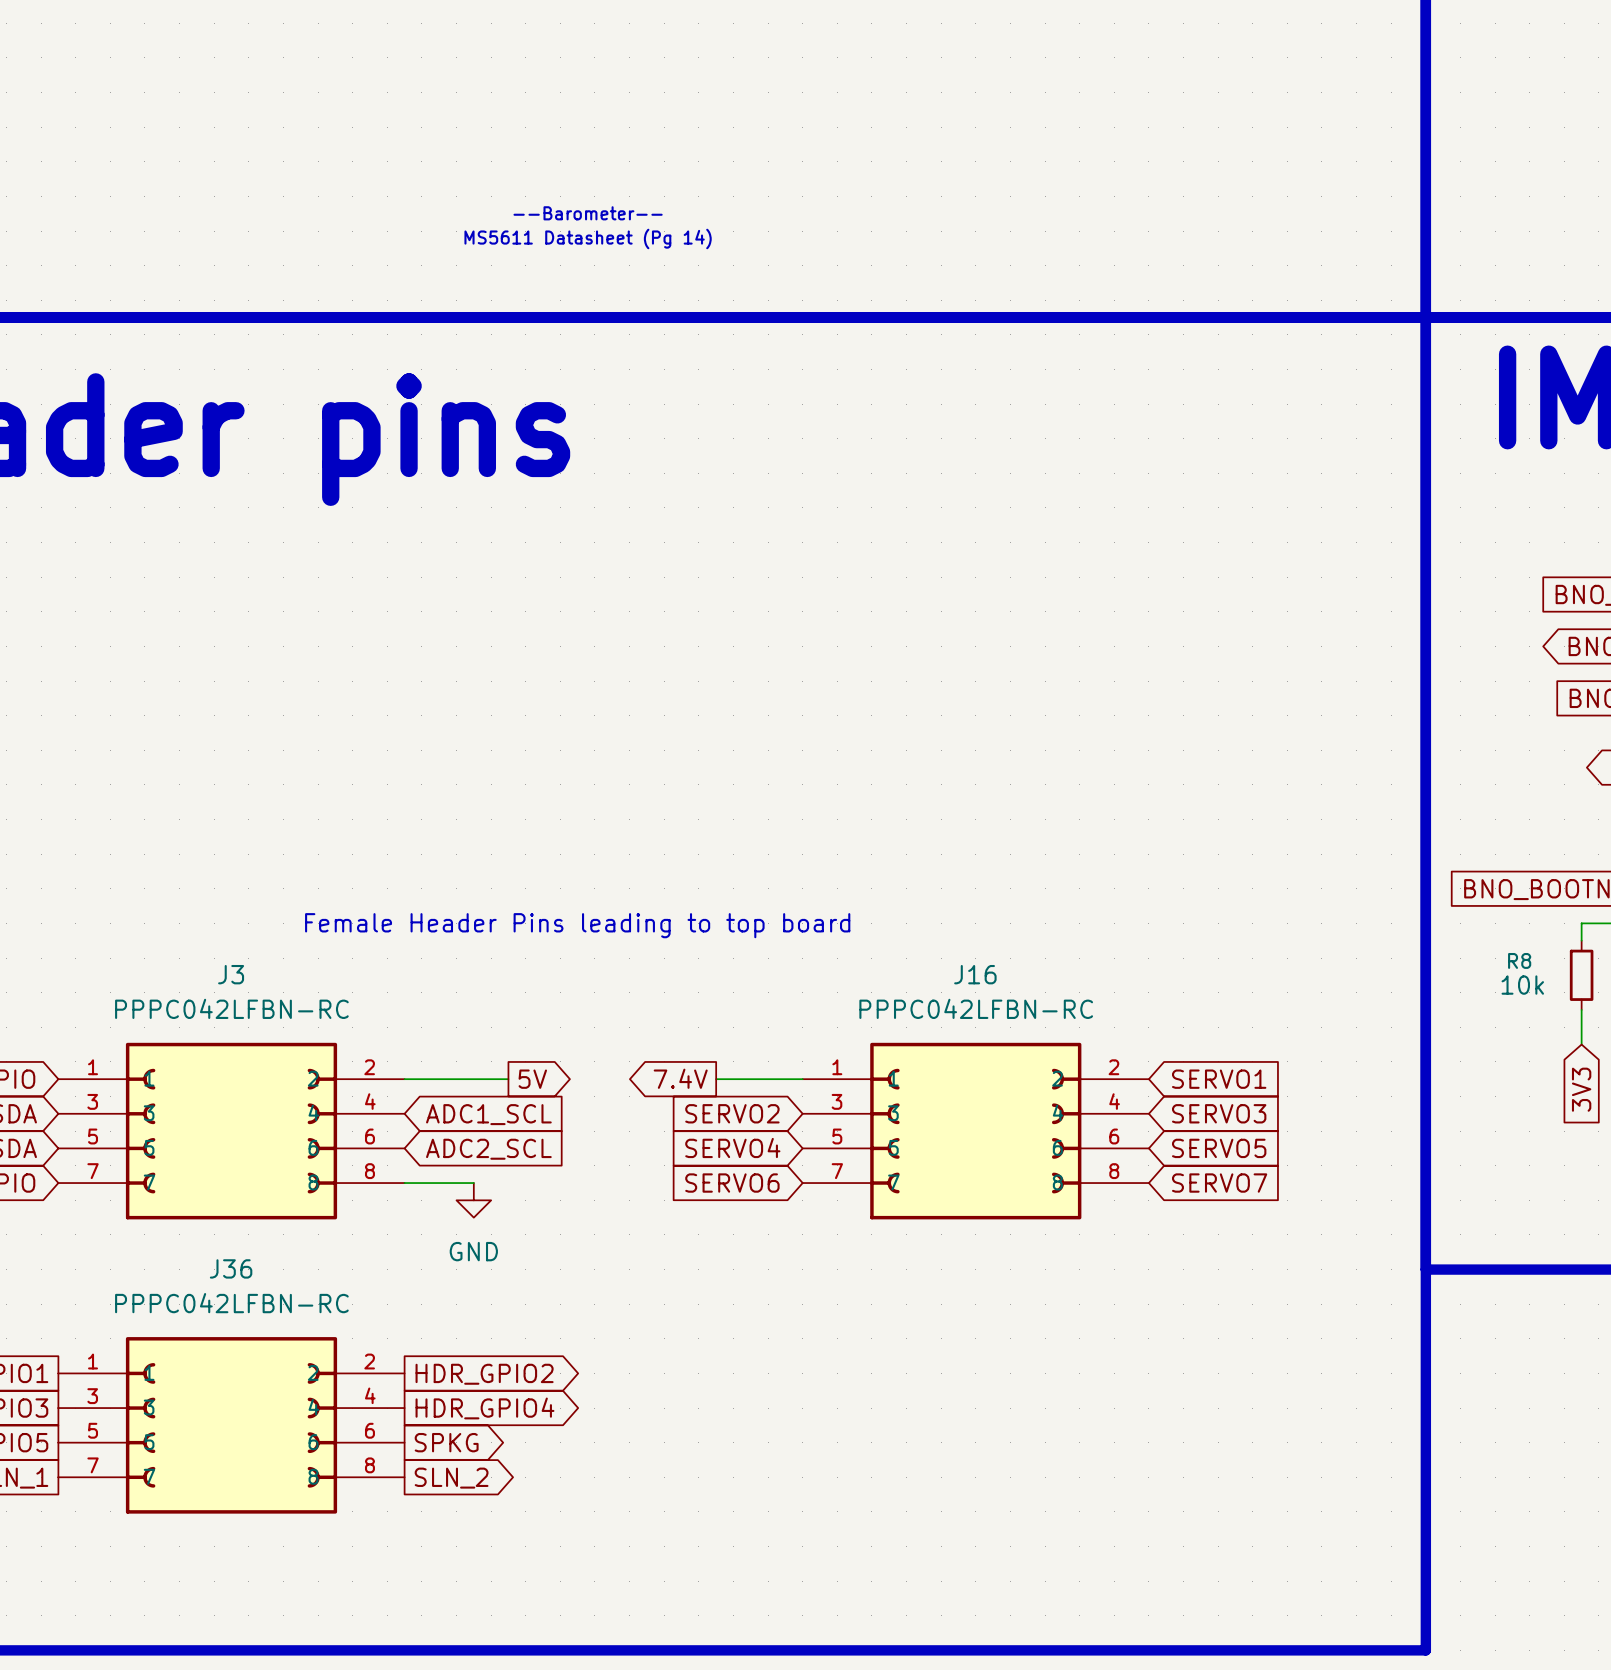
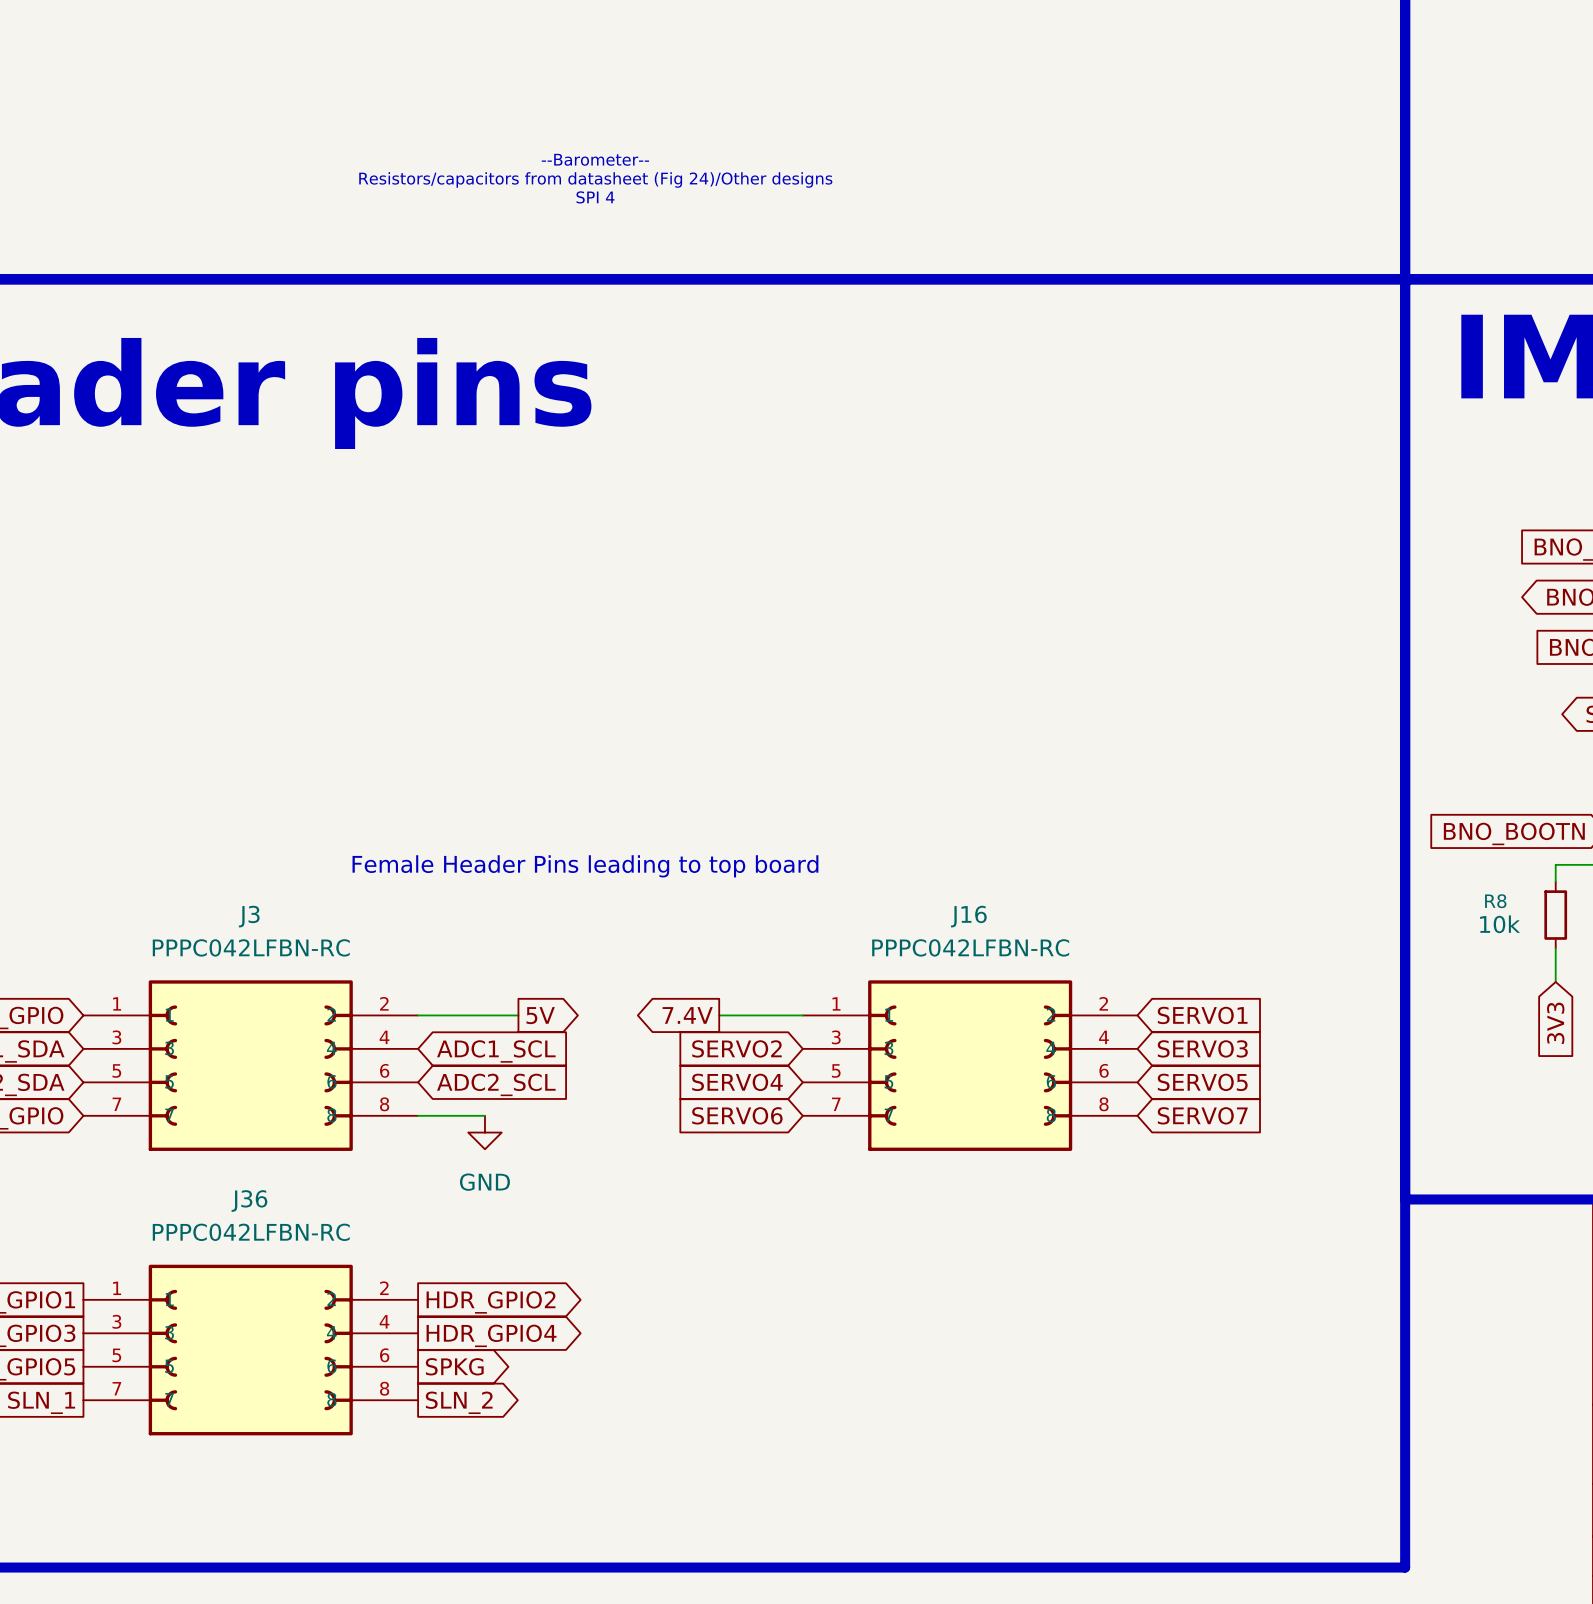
text: none -> --Barometer-- (595, 159)
text: --Barometer-- (588, 213) -> Resistors/capacitors from datasheet (Fig 24)/Other designs (595, 179)
text: MS5611 Datasheet (Pg 14) (588, 238) -> SPI 4 (595, 197)

